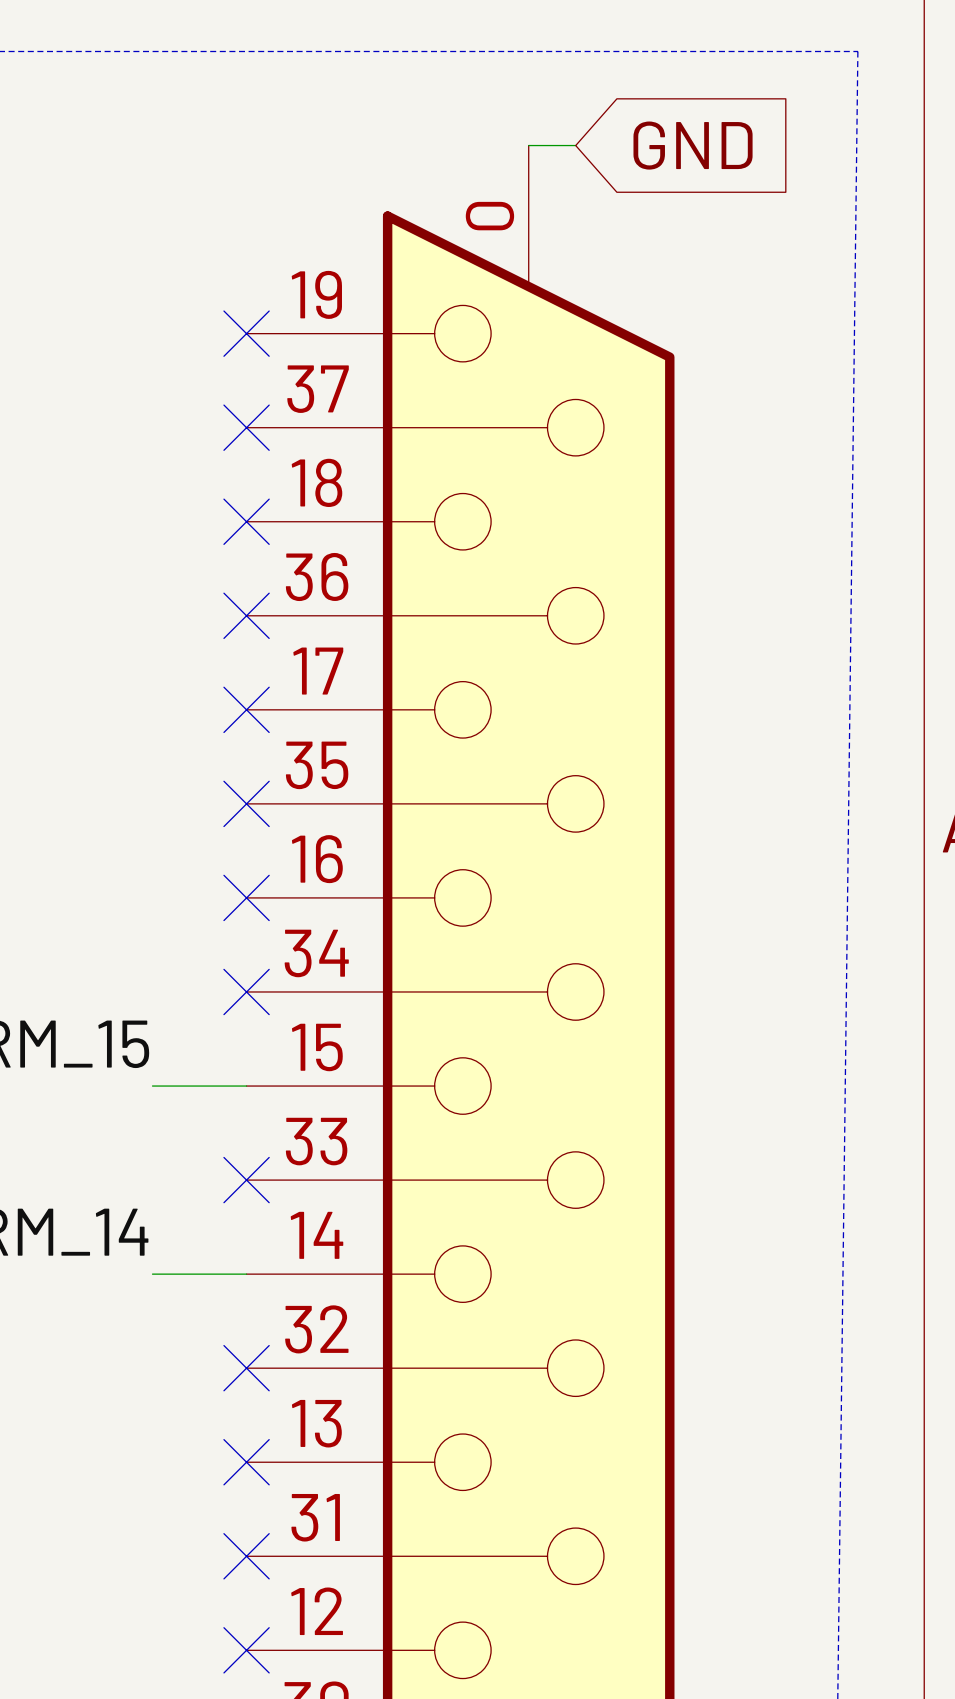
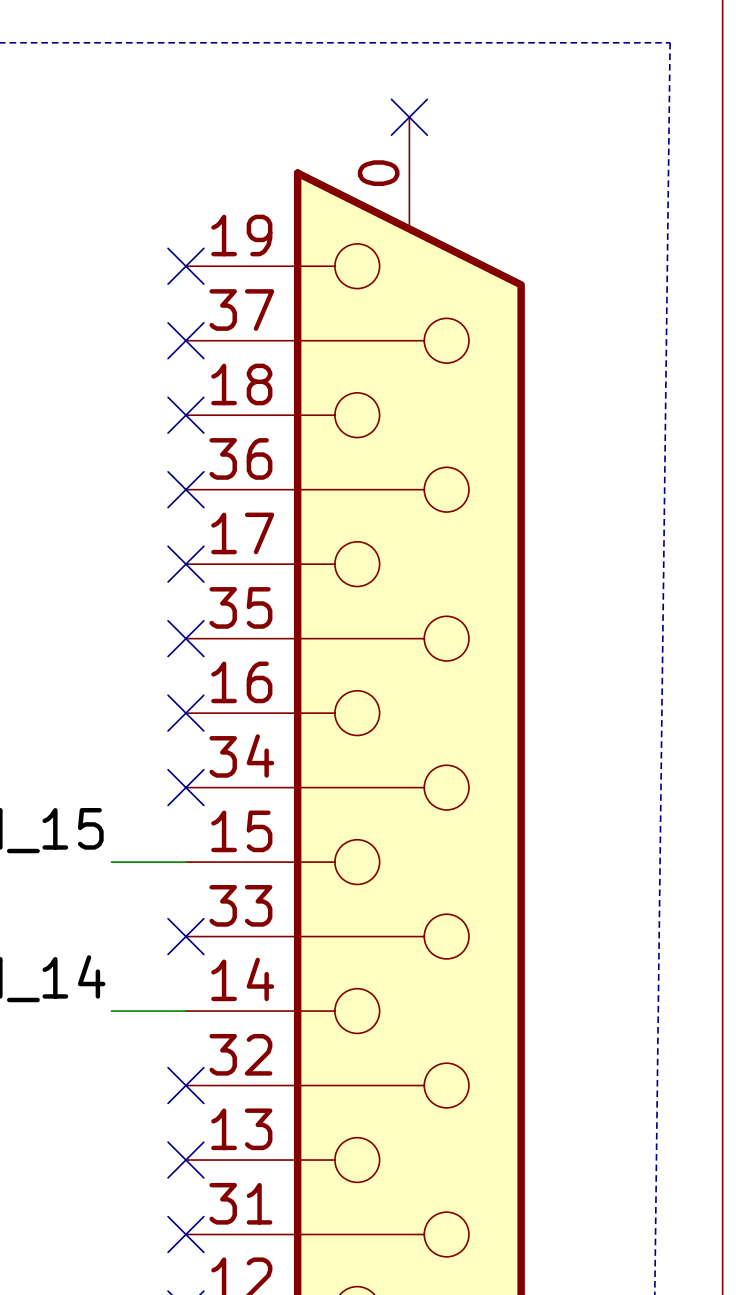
wire: (528, 145) (575, 145) -> none
no-connect mark: none -> (409, 117)
global label: GND (693, 145) -> none

